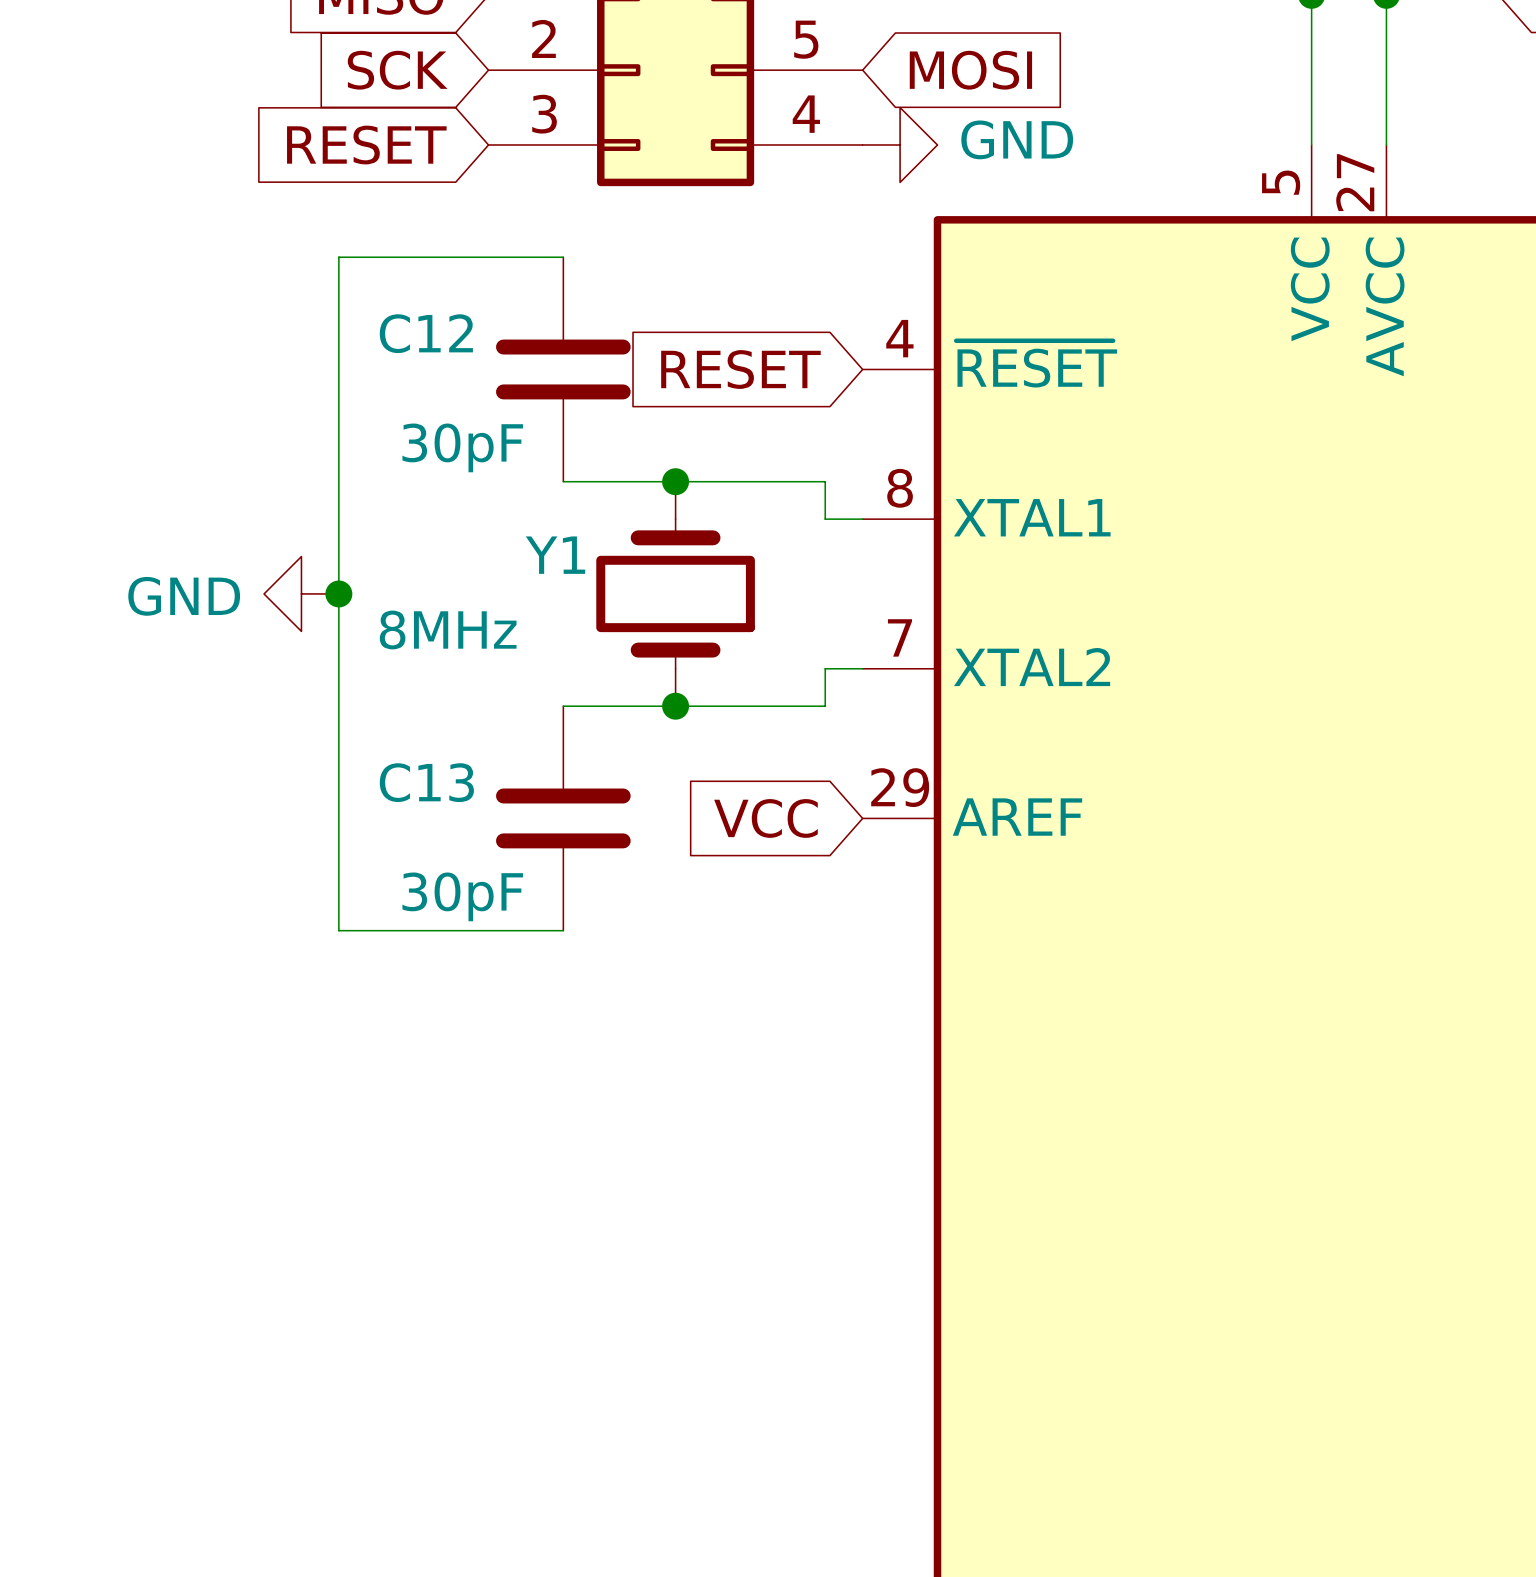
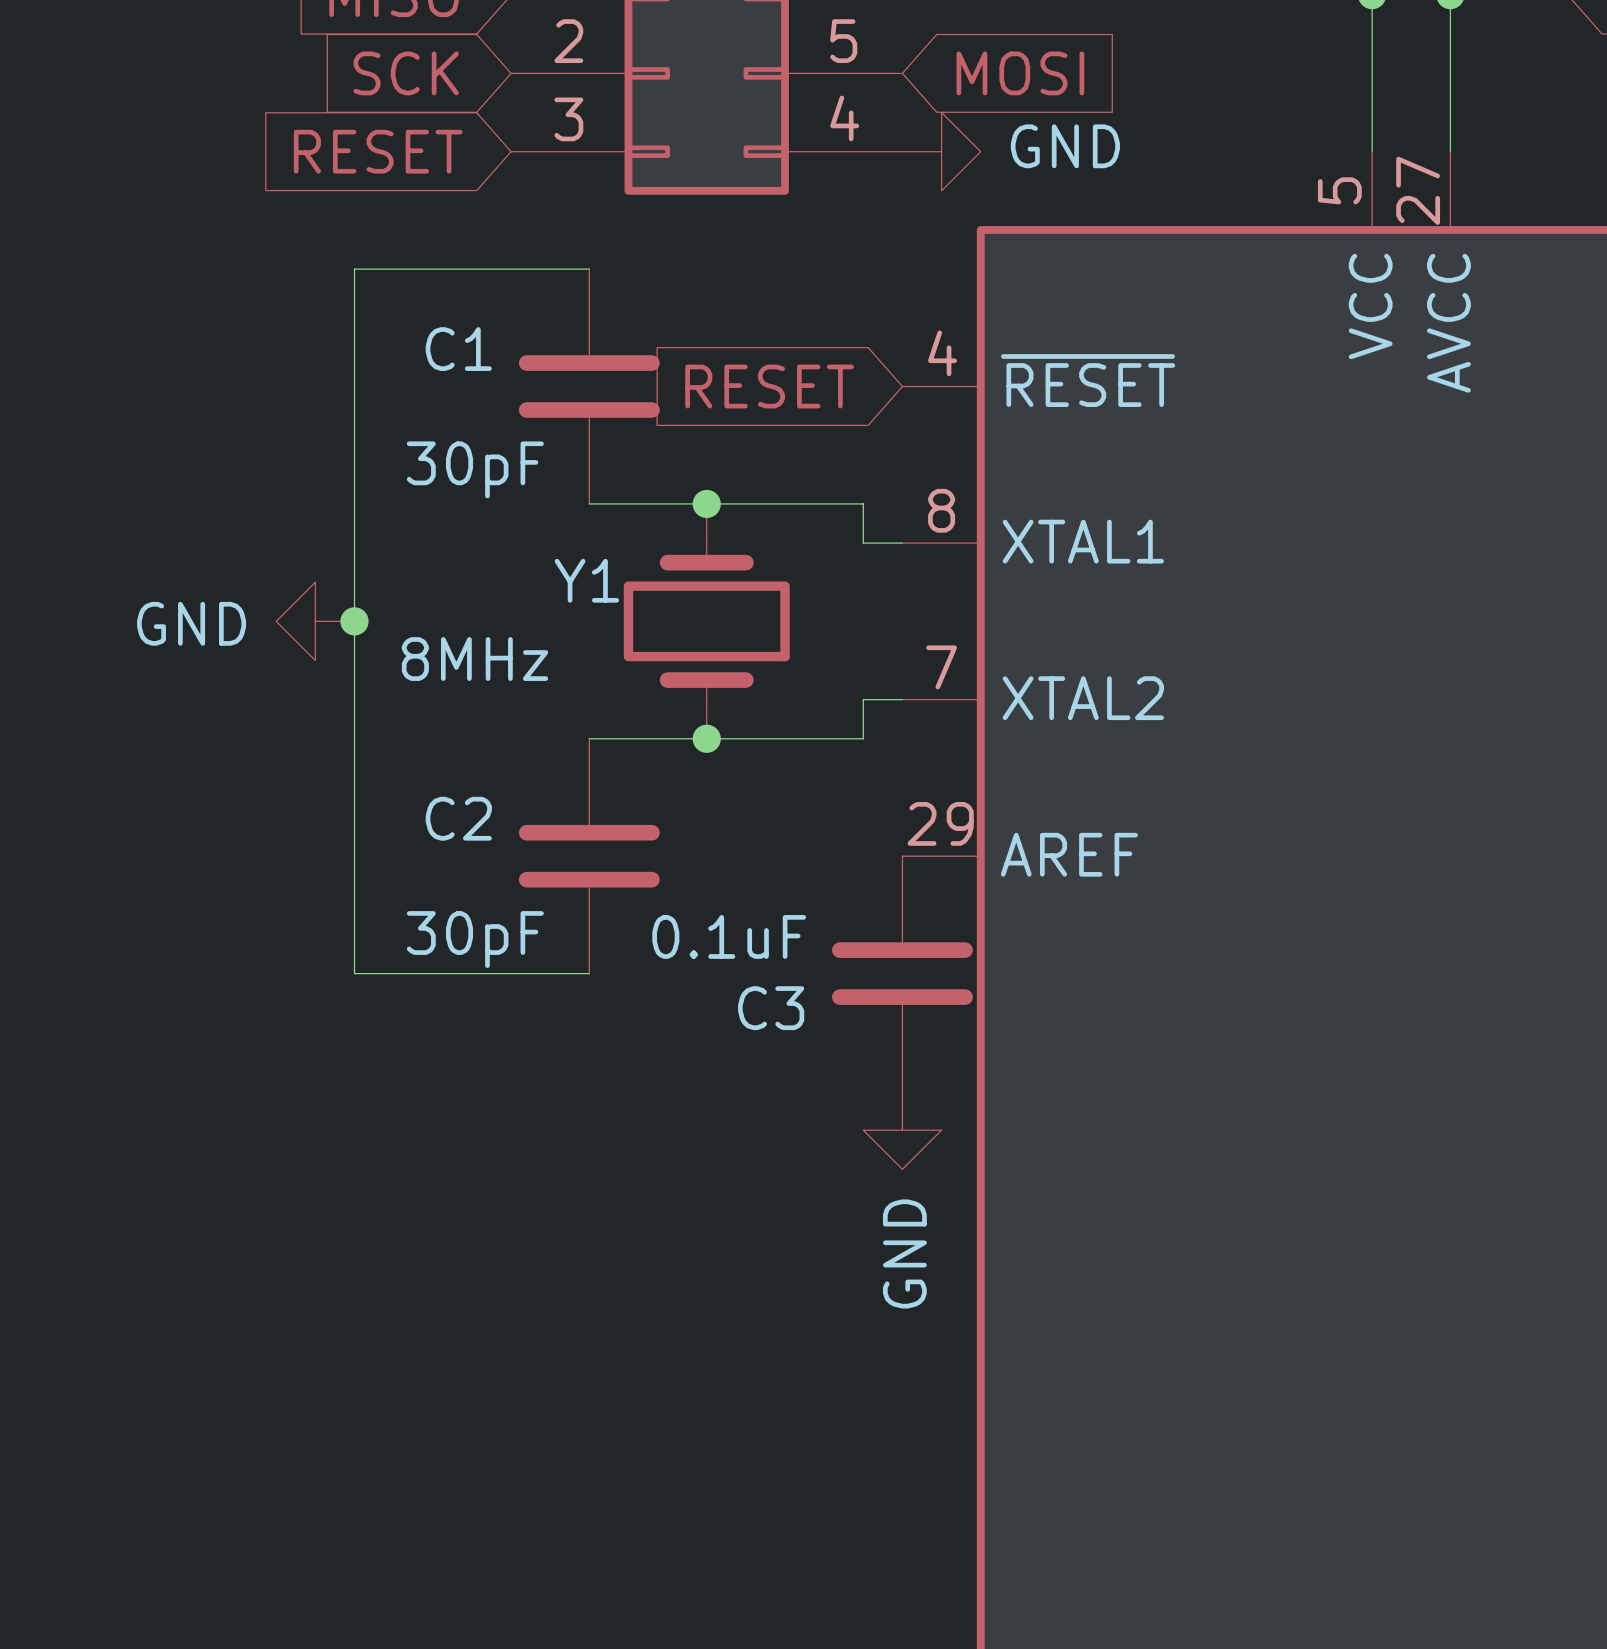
C12 name: C12 (426, 333) -> C1 (458, 349)
C13 name: C13 (426, 782) -> C2 (458, 818)
global label: VCC (765, 818) -> none
C3: none -> 0.1uF (902, 973)
power symbol: none -> GND (902, 1130)

